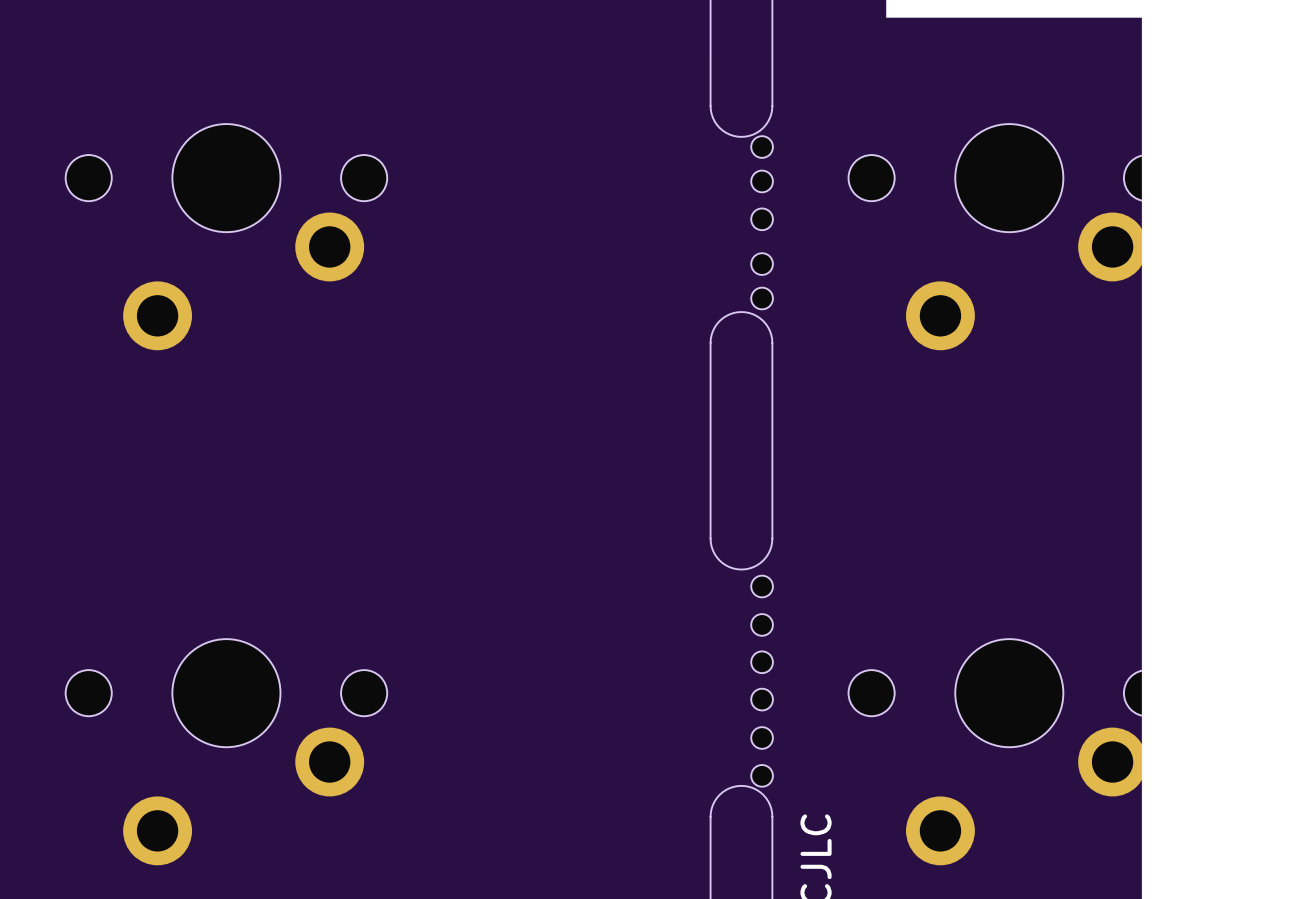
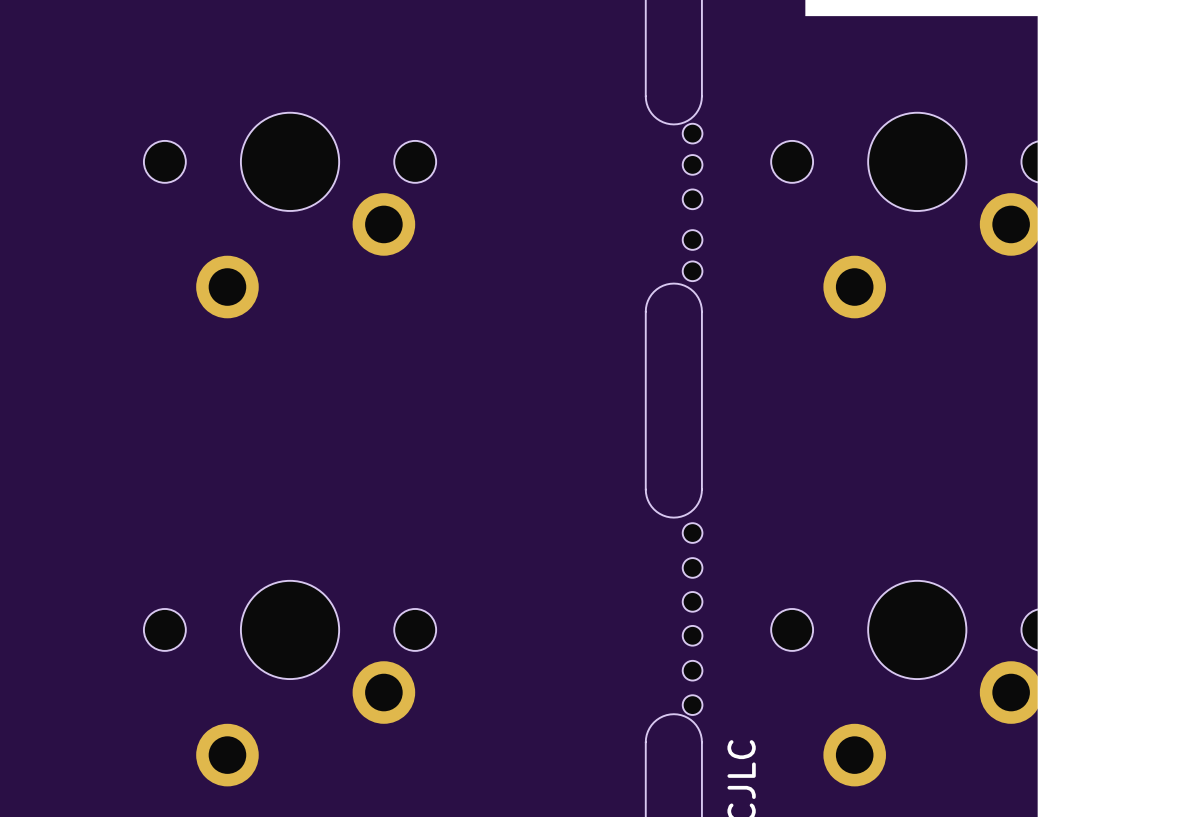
part position: (226, 237) -> (290, 215)
part position: (226, 752) -> (290, 683)

